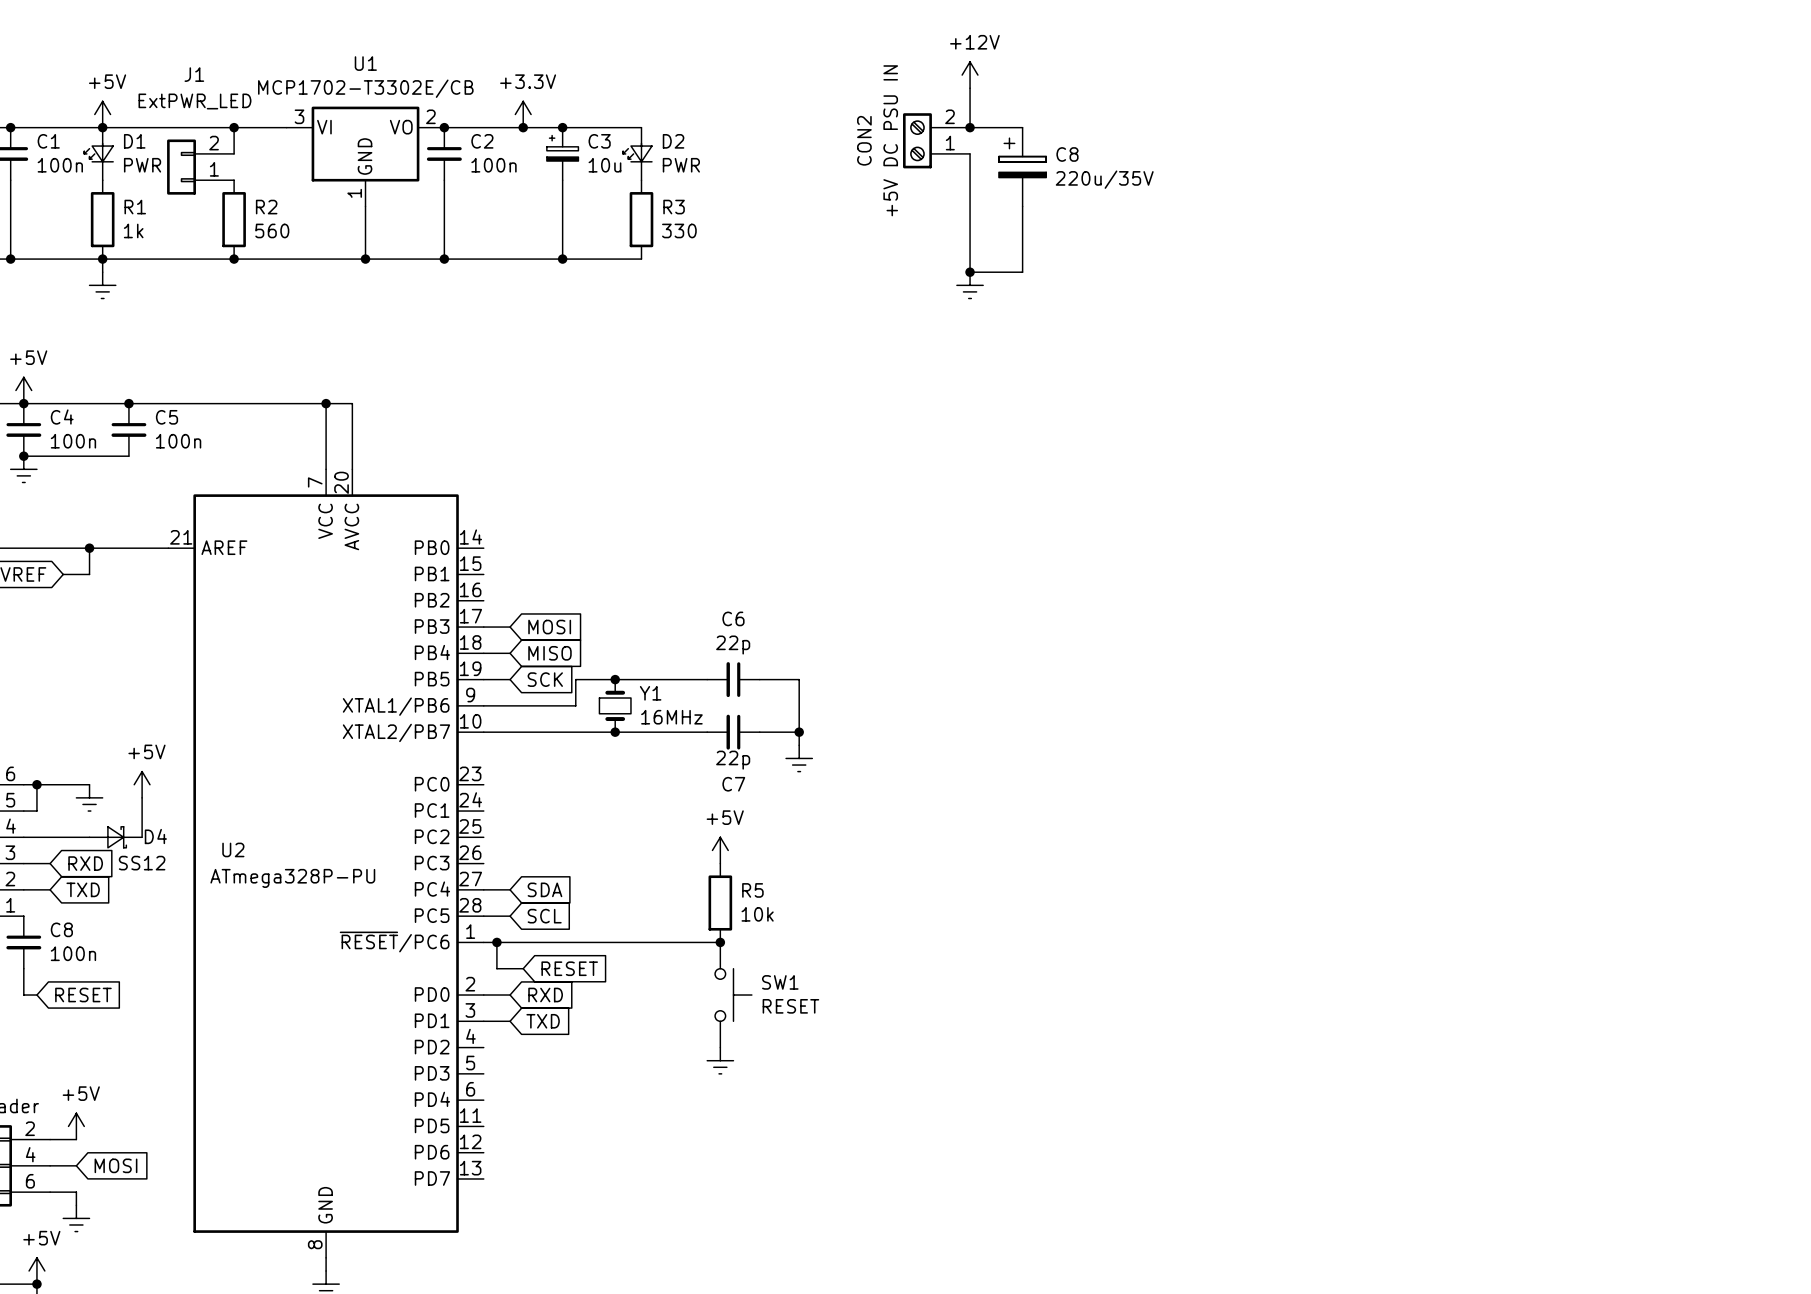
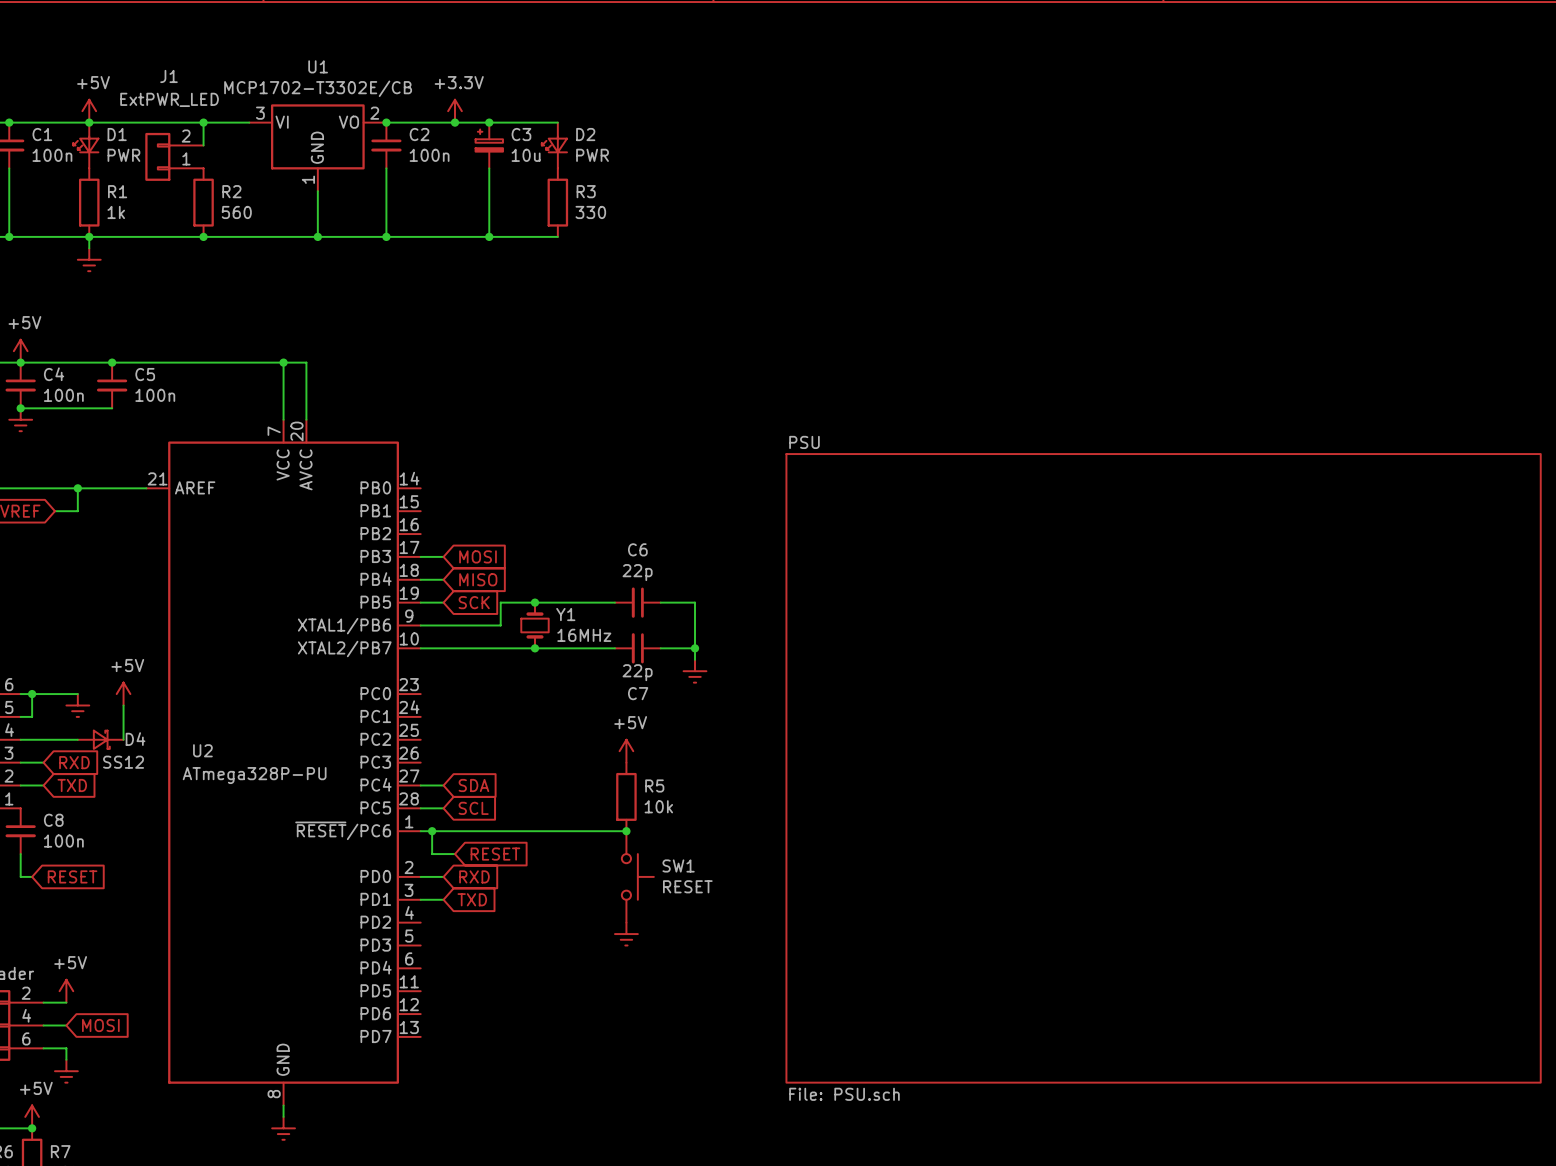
power symbol: +12V (970, 75) -> none
wire: (970, 88) (970, 127) (1022, 127) -> none
junction: (970, 127) -> none
CON2: +5V DC PSU IN (936, 140) -> none
wire: (970, 153) (970, 272) (1022, 272) (1022, 206) -> none
C8: 220u/35V (1022, 167) -> none
junction: (970, 272) -> none
power symbol: (970, 285) -> none
sheet PSU: none -> File: PSU.sch (1163, 768)

